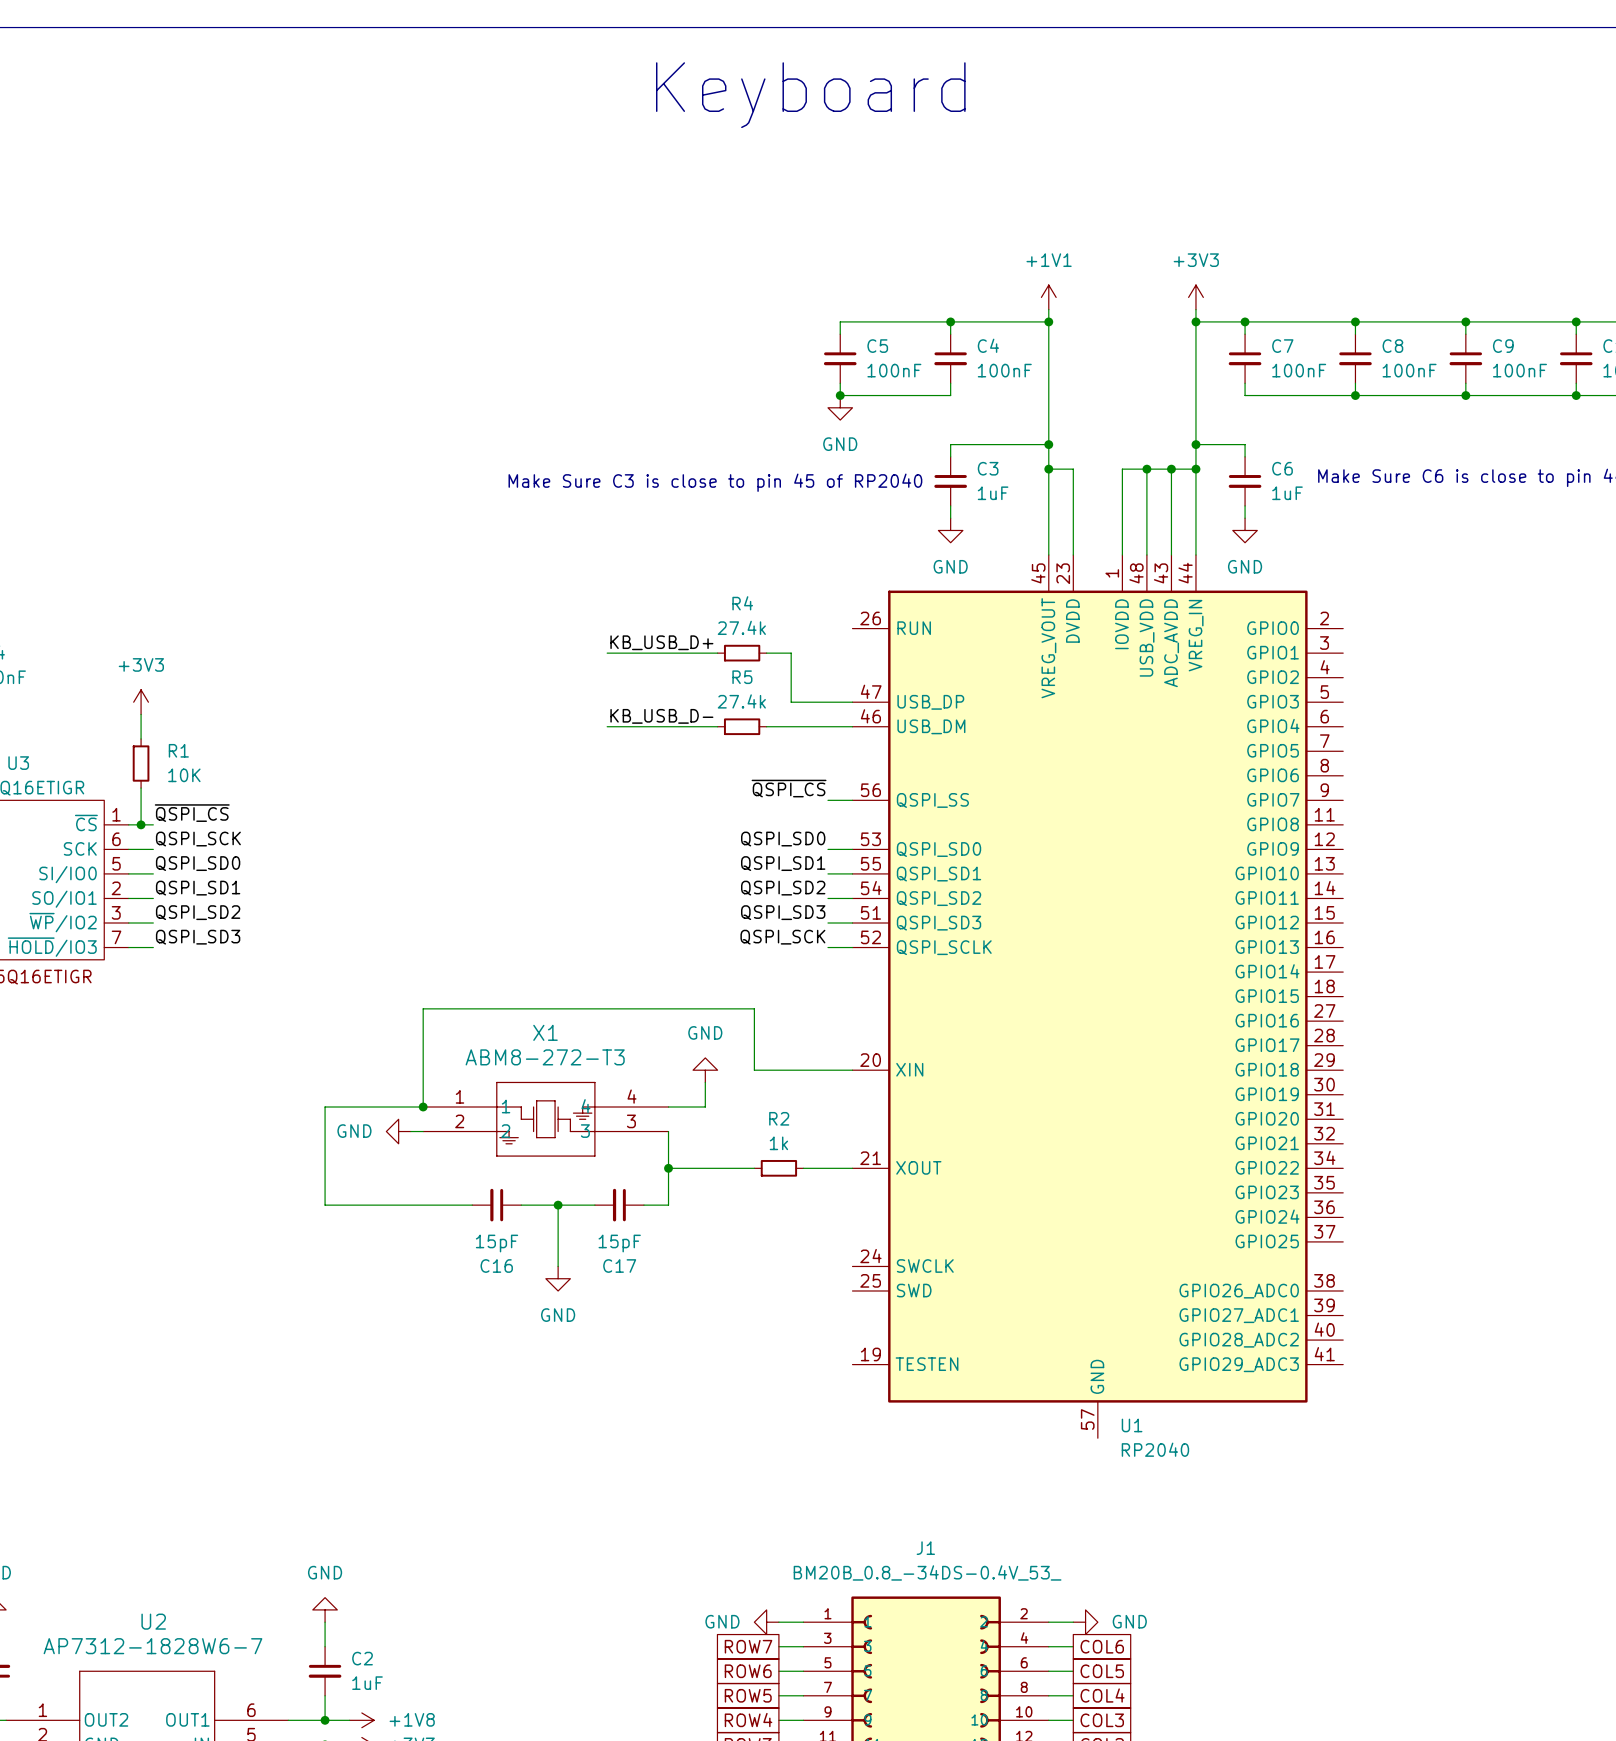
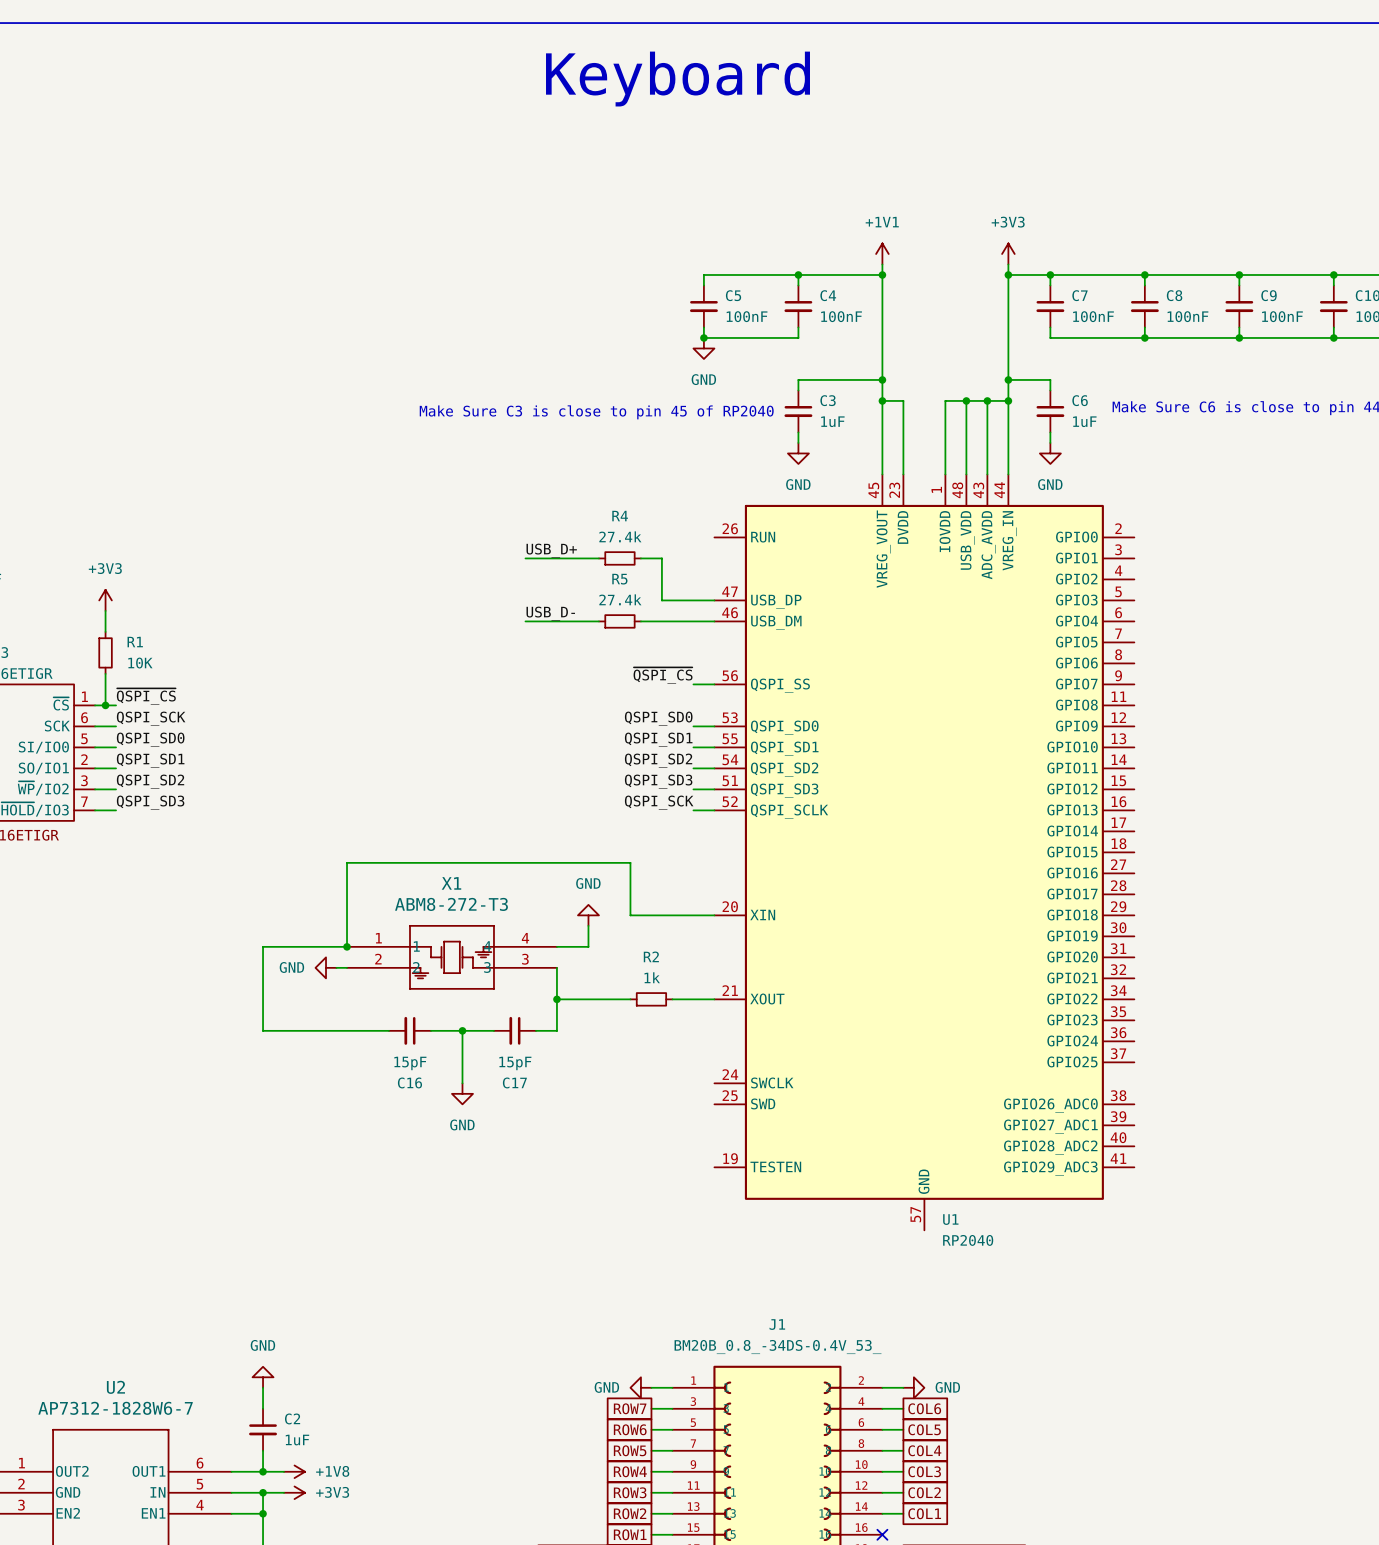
label: KB_USB_D+ (661, 642) -> USB_D+ (551, 550)
wire: (607, 653) (631, 653) -> none
label: KB_USB_D- (661, 716) -> USB_D- (550, 613)
wire: (607, 726) (631, 726) -> none

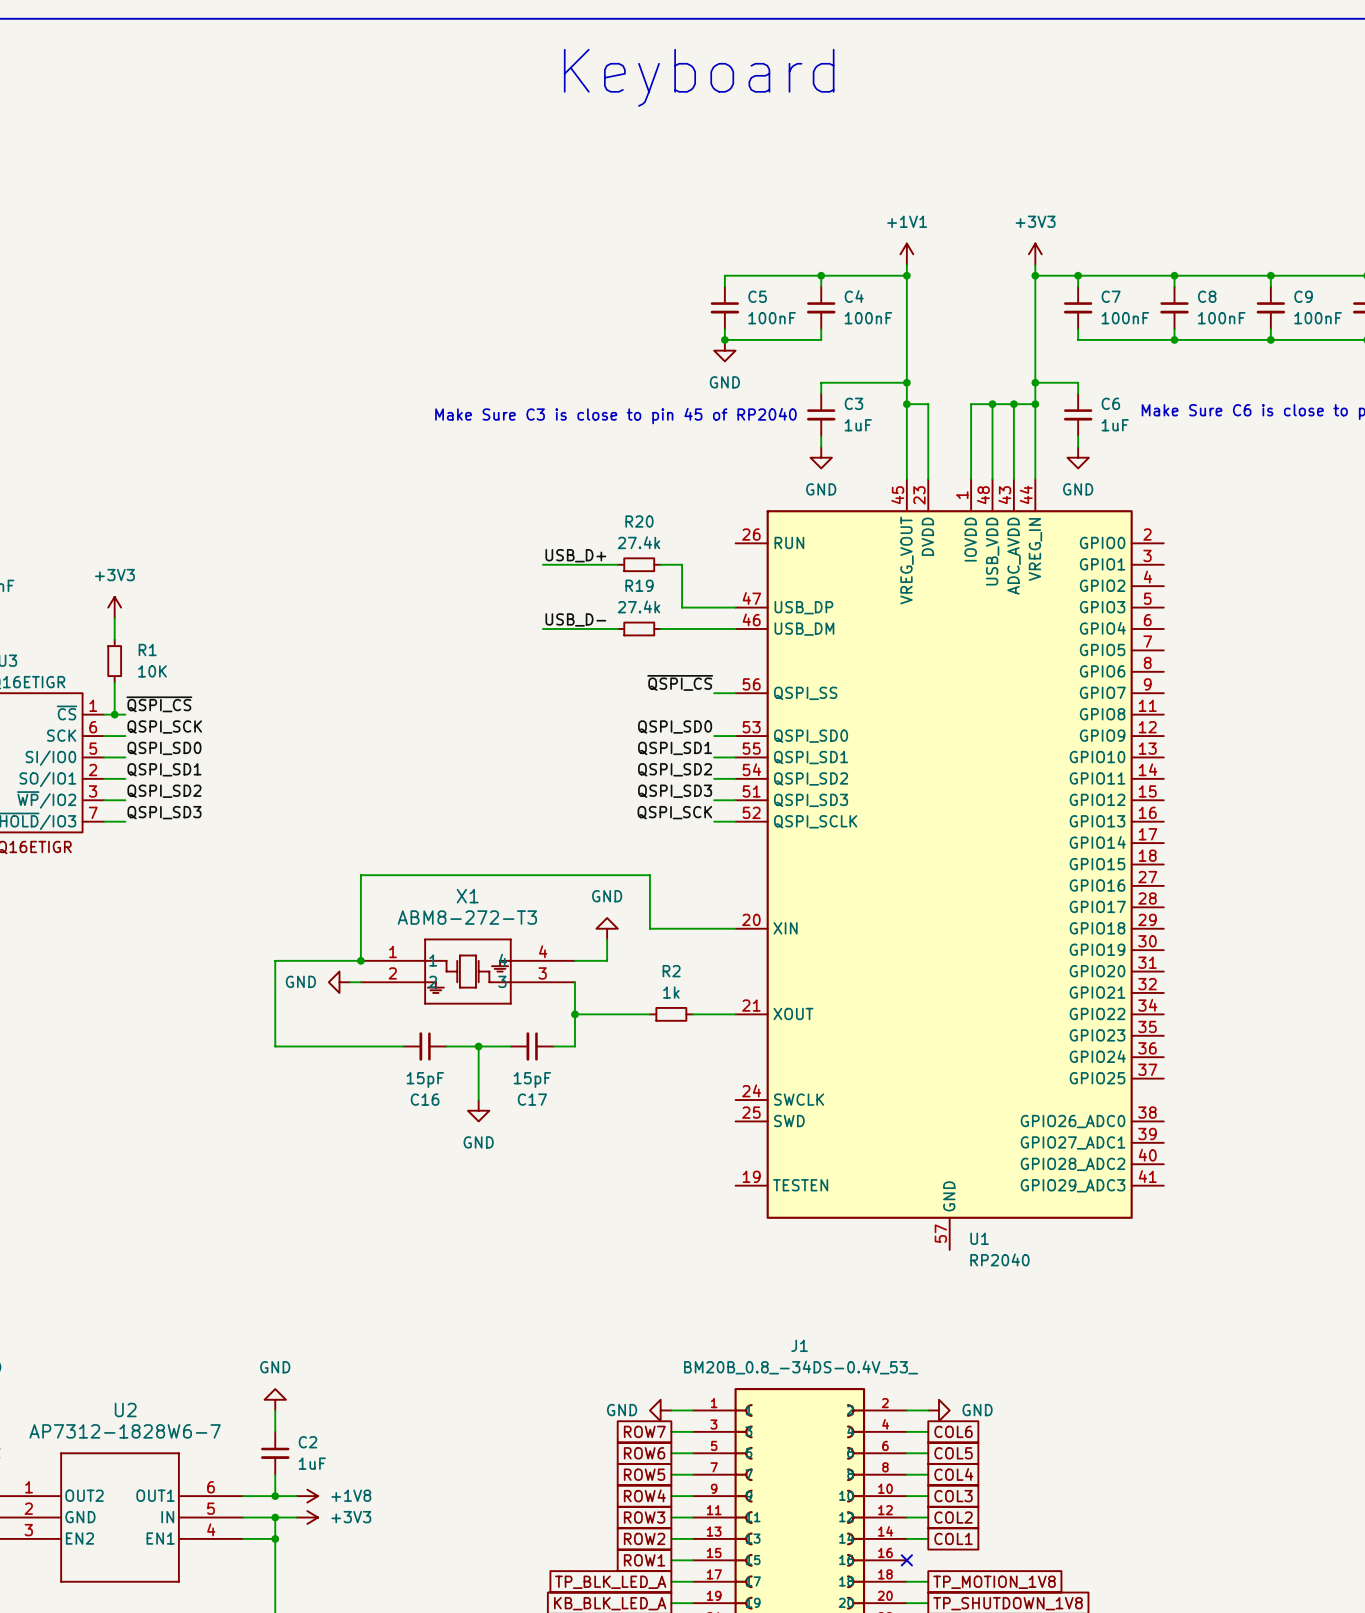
R4 name: R4 (620, 516) -> R20 (639, 521)
R5 name: R5 (619, 579) -> R19 (639, 585)

